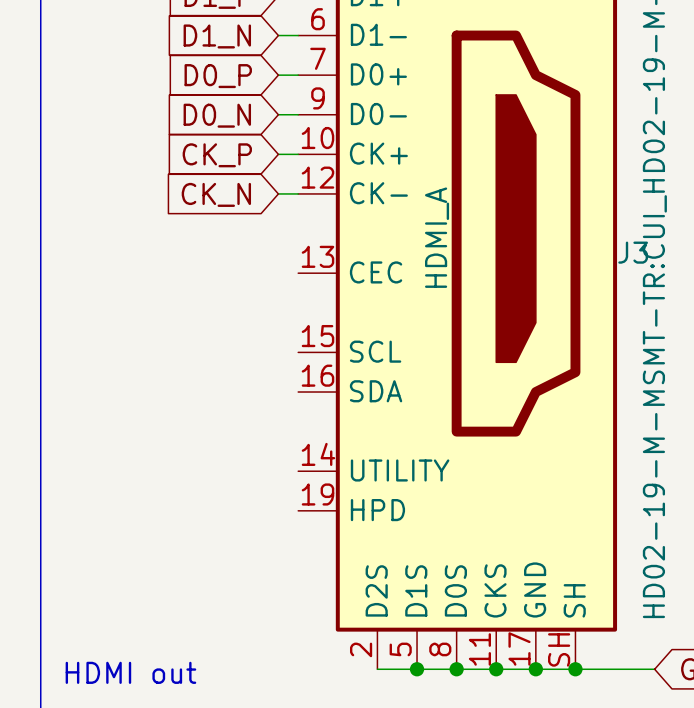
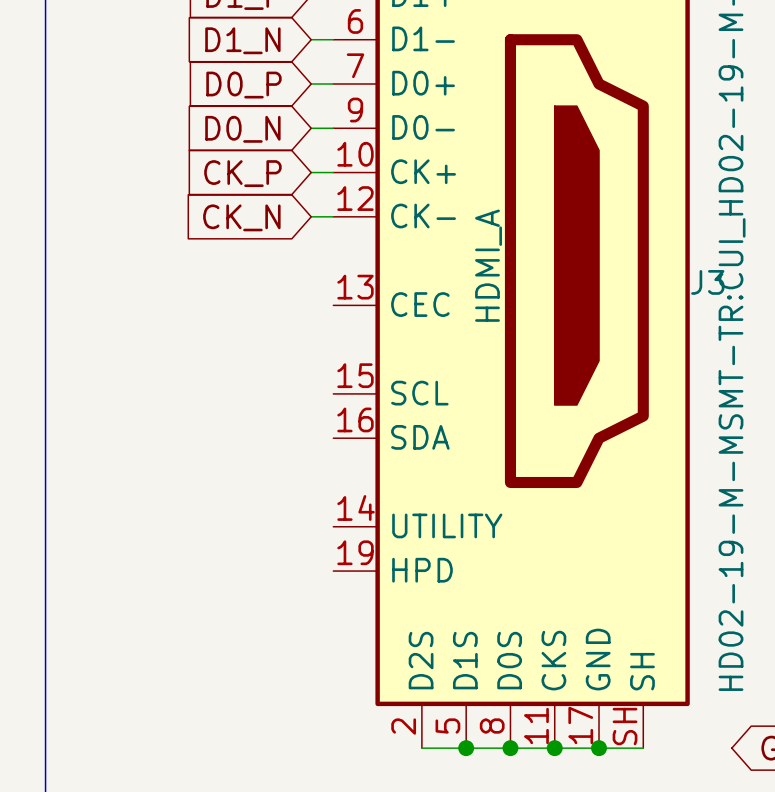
wire: (575, 669) (654, 669) -> none
junction: (575, 669) -> none
text: HDMI out (130, 672) -> none

